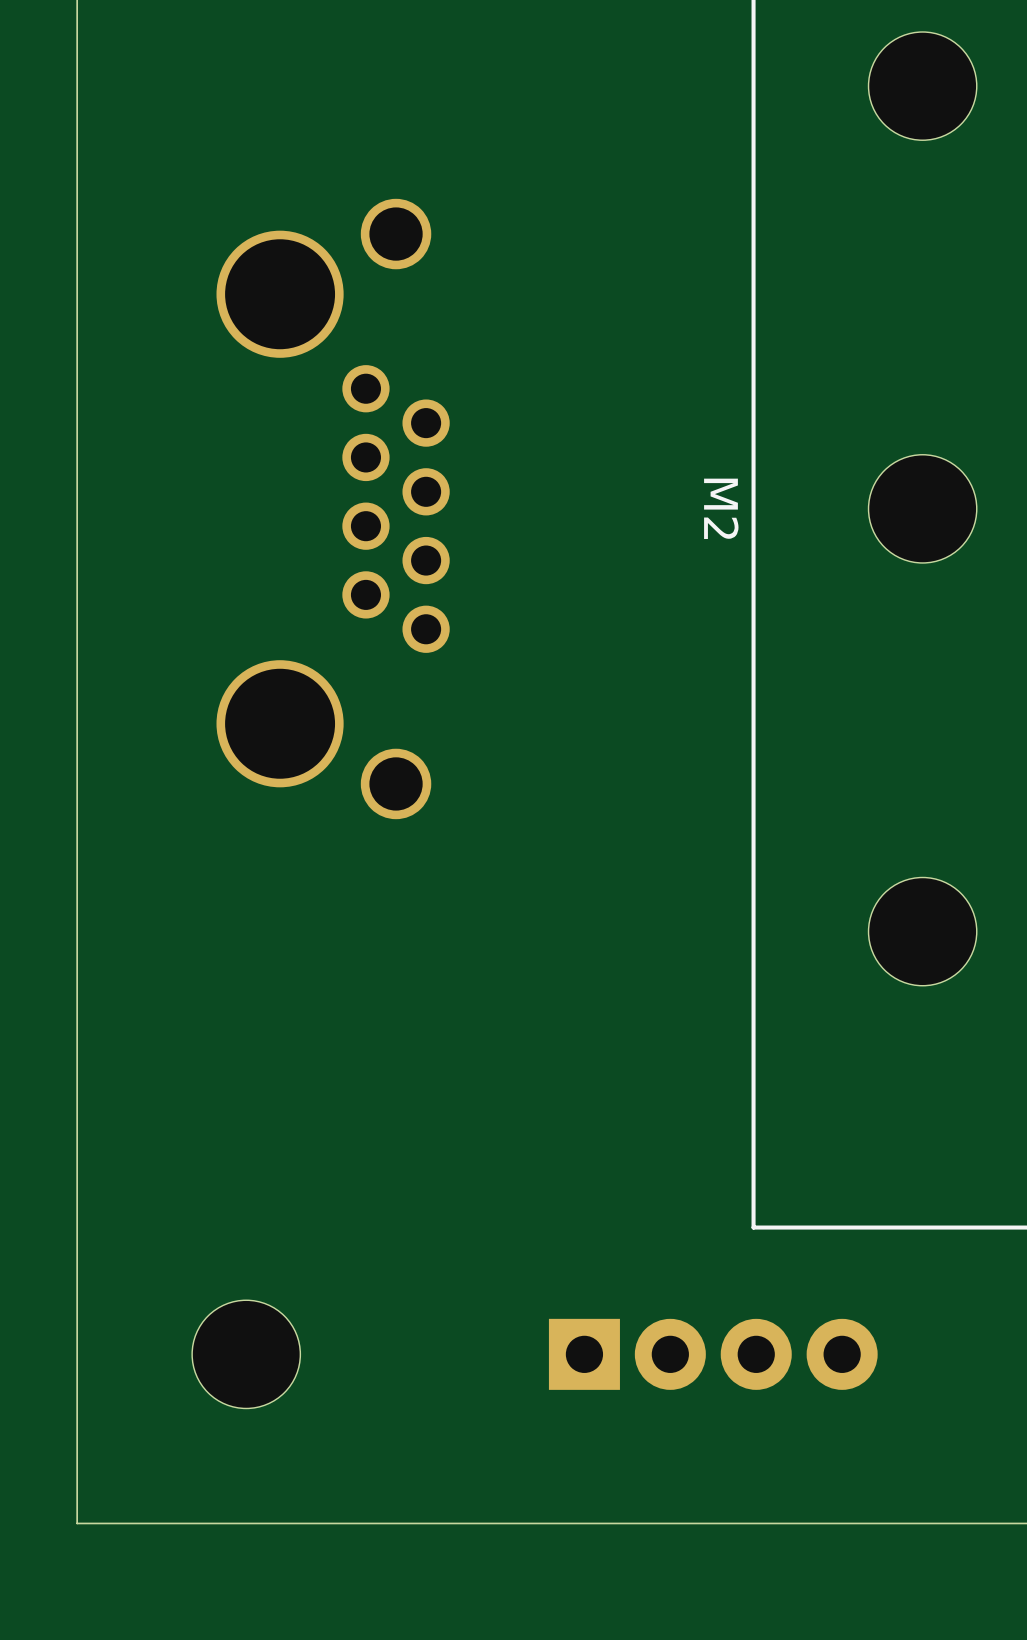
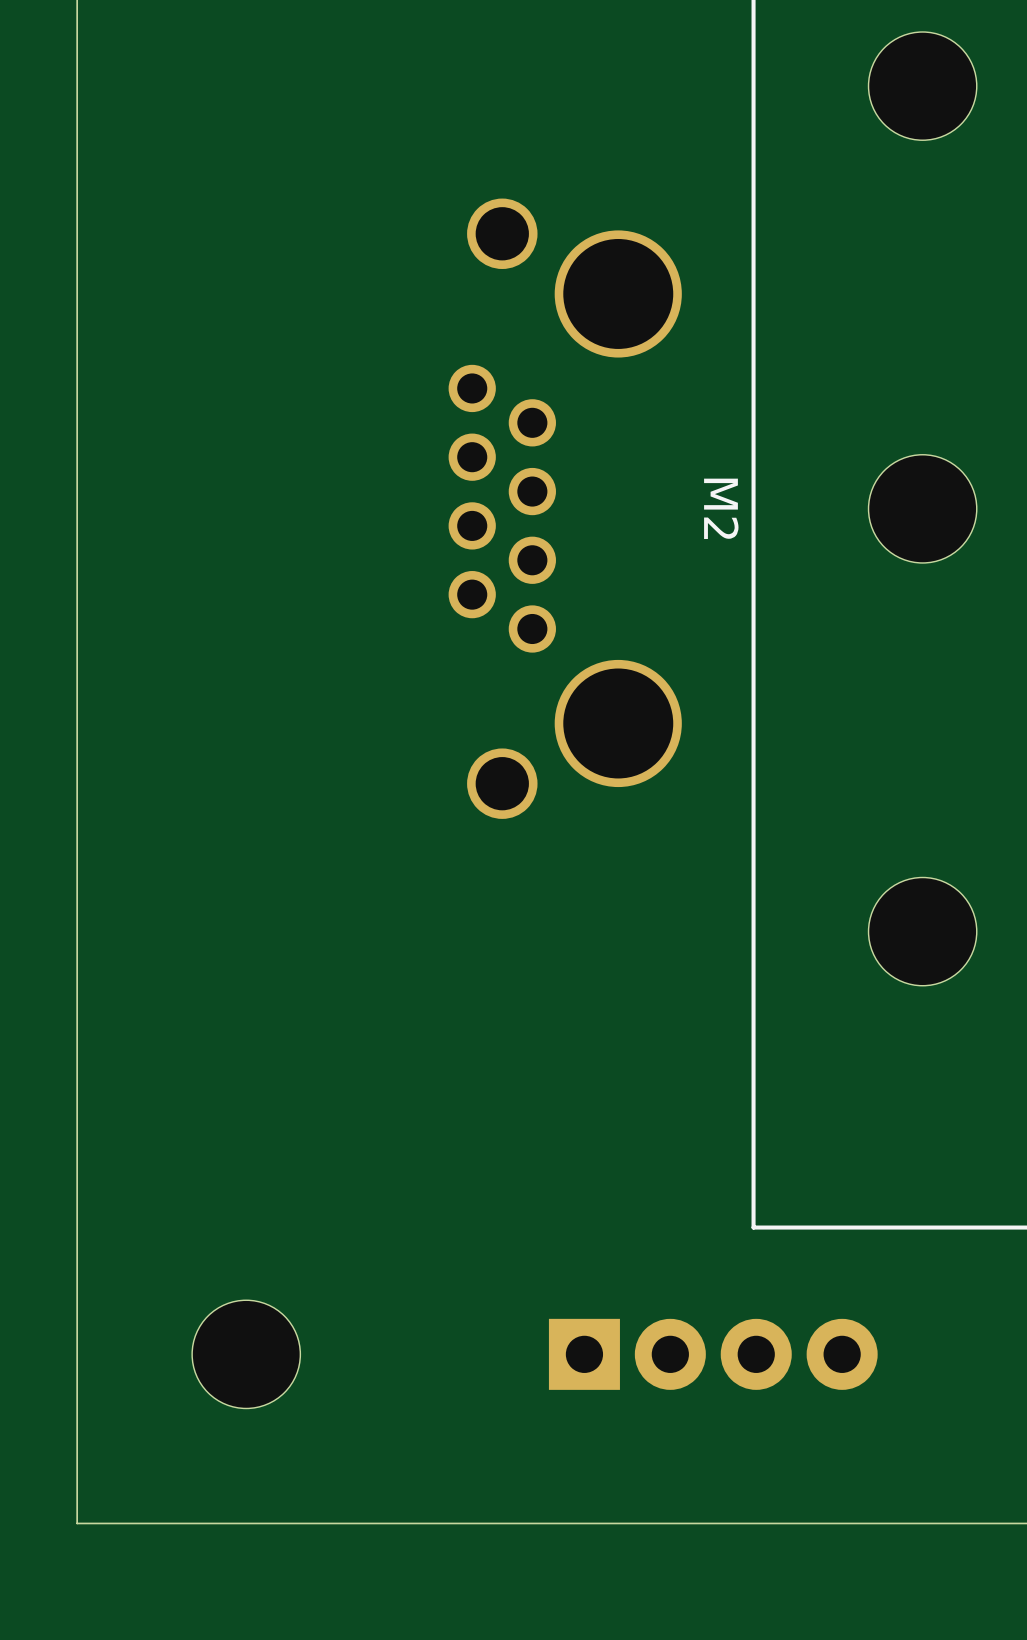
part rotation: 0° (333, 509) -> 180° (565, 508)

